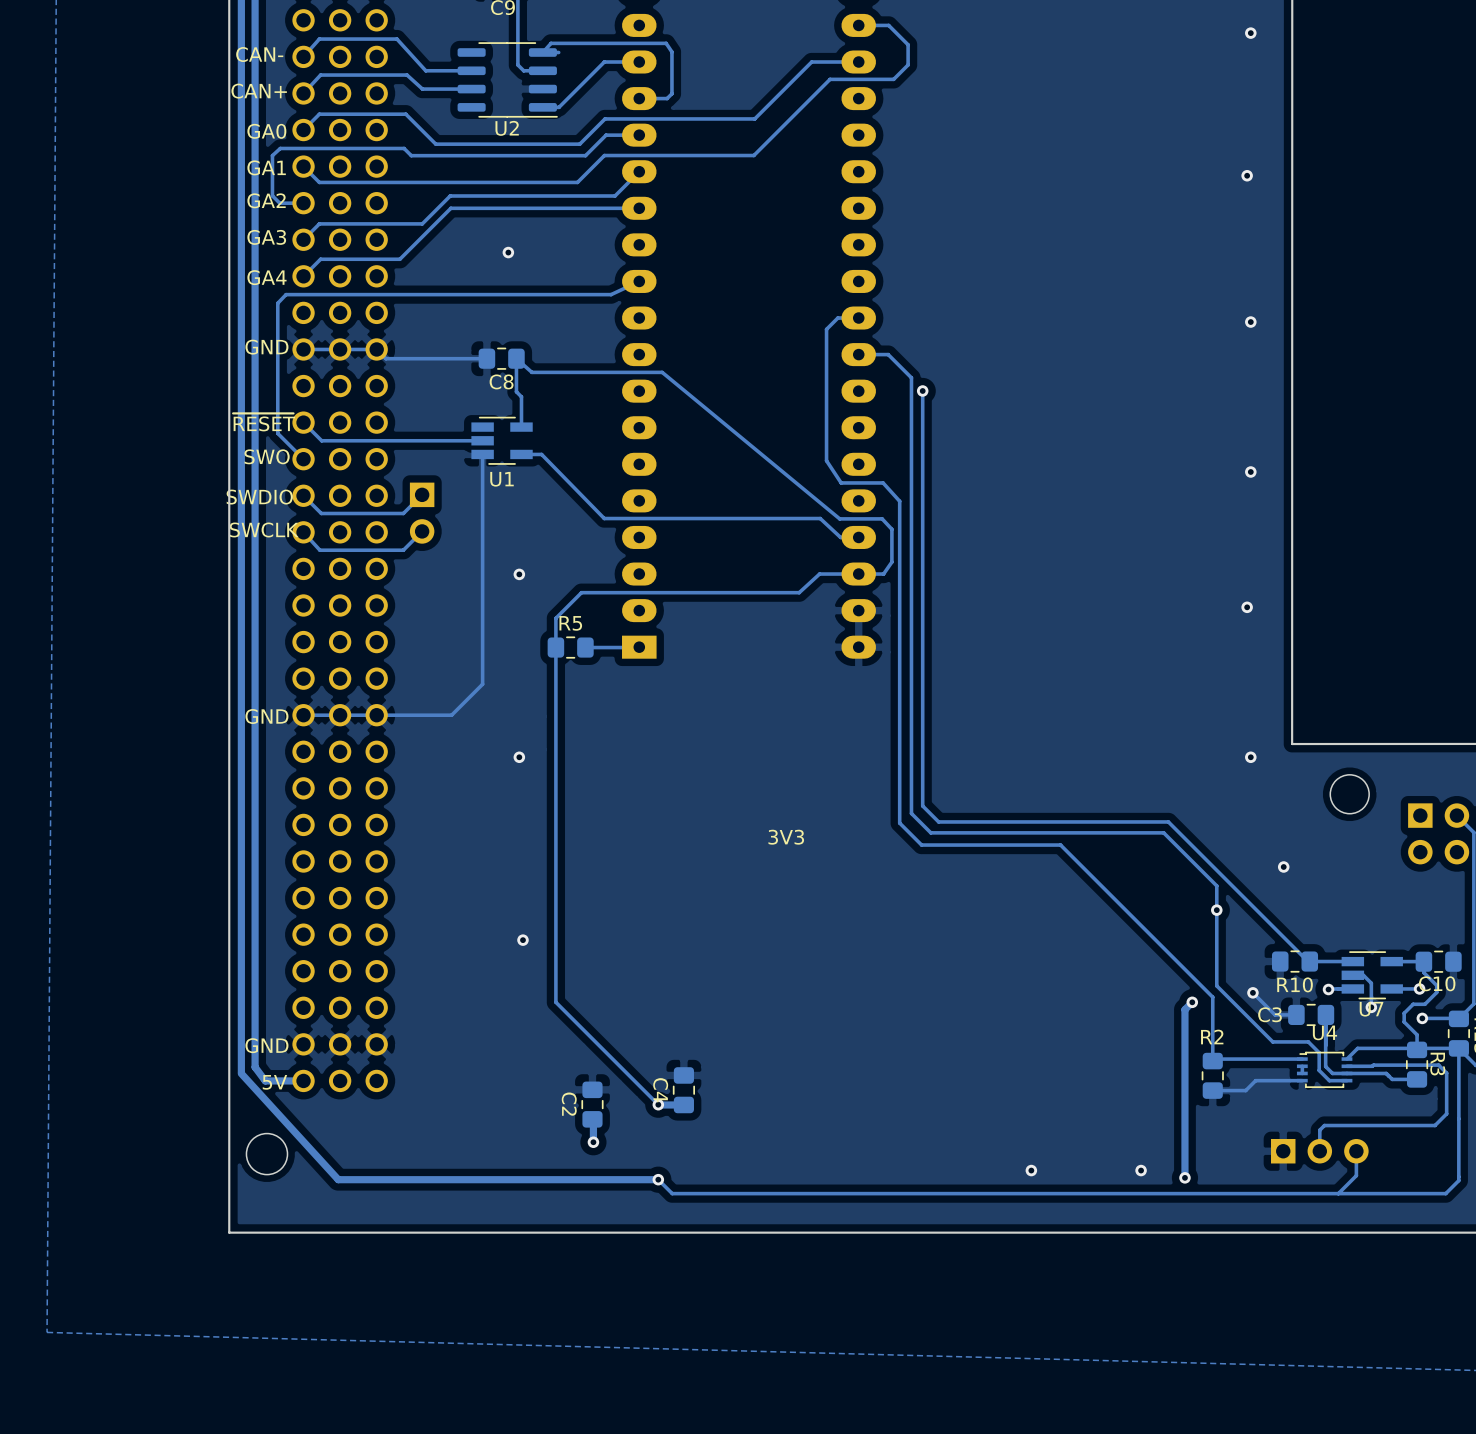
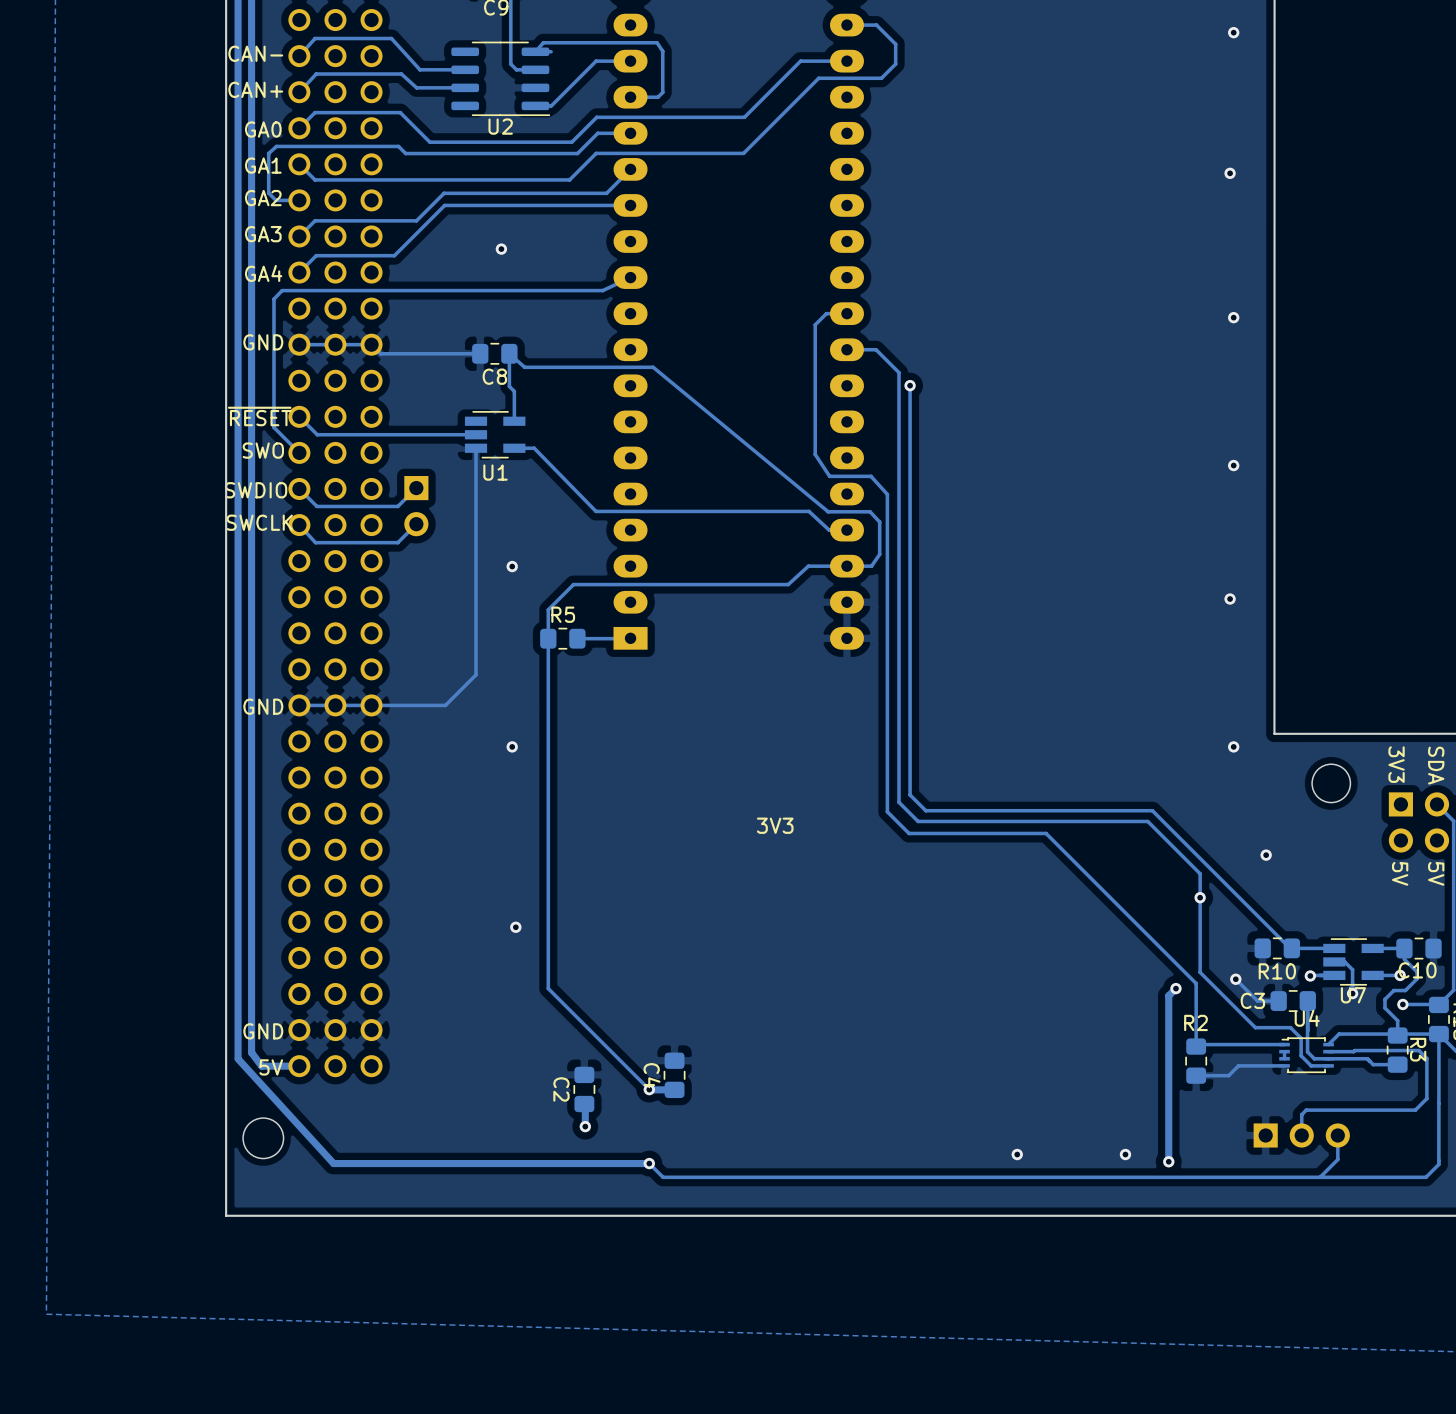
text: none -> 3V3 (1396, 764)
text: none -> SDA (1436, 765)
text: none -> 5V (1400, 873)
text: none -> 5V (1436, 873)

